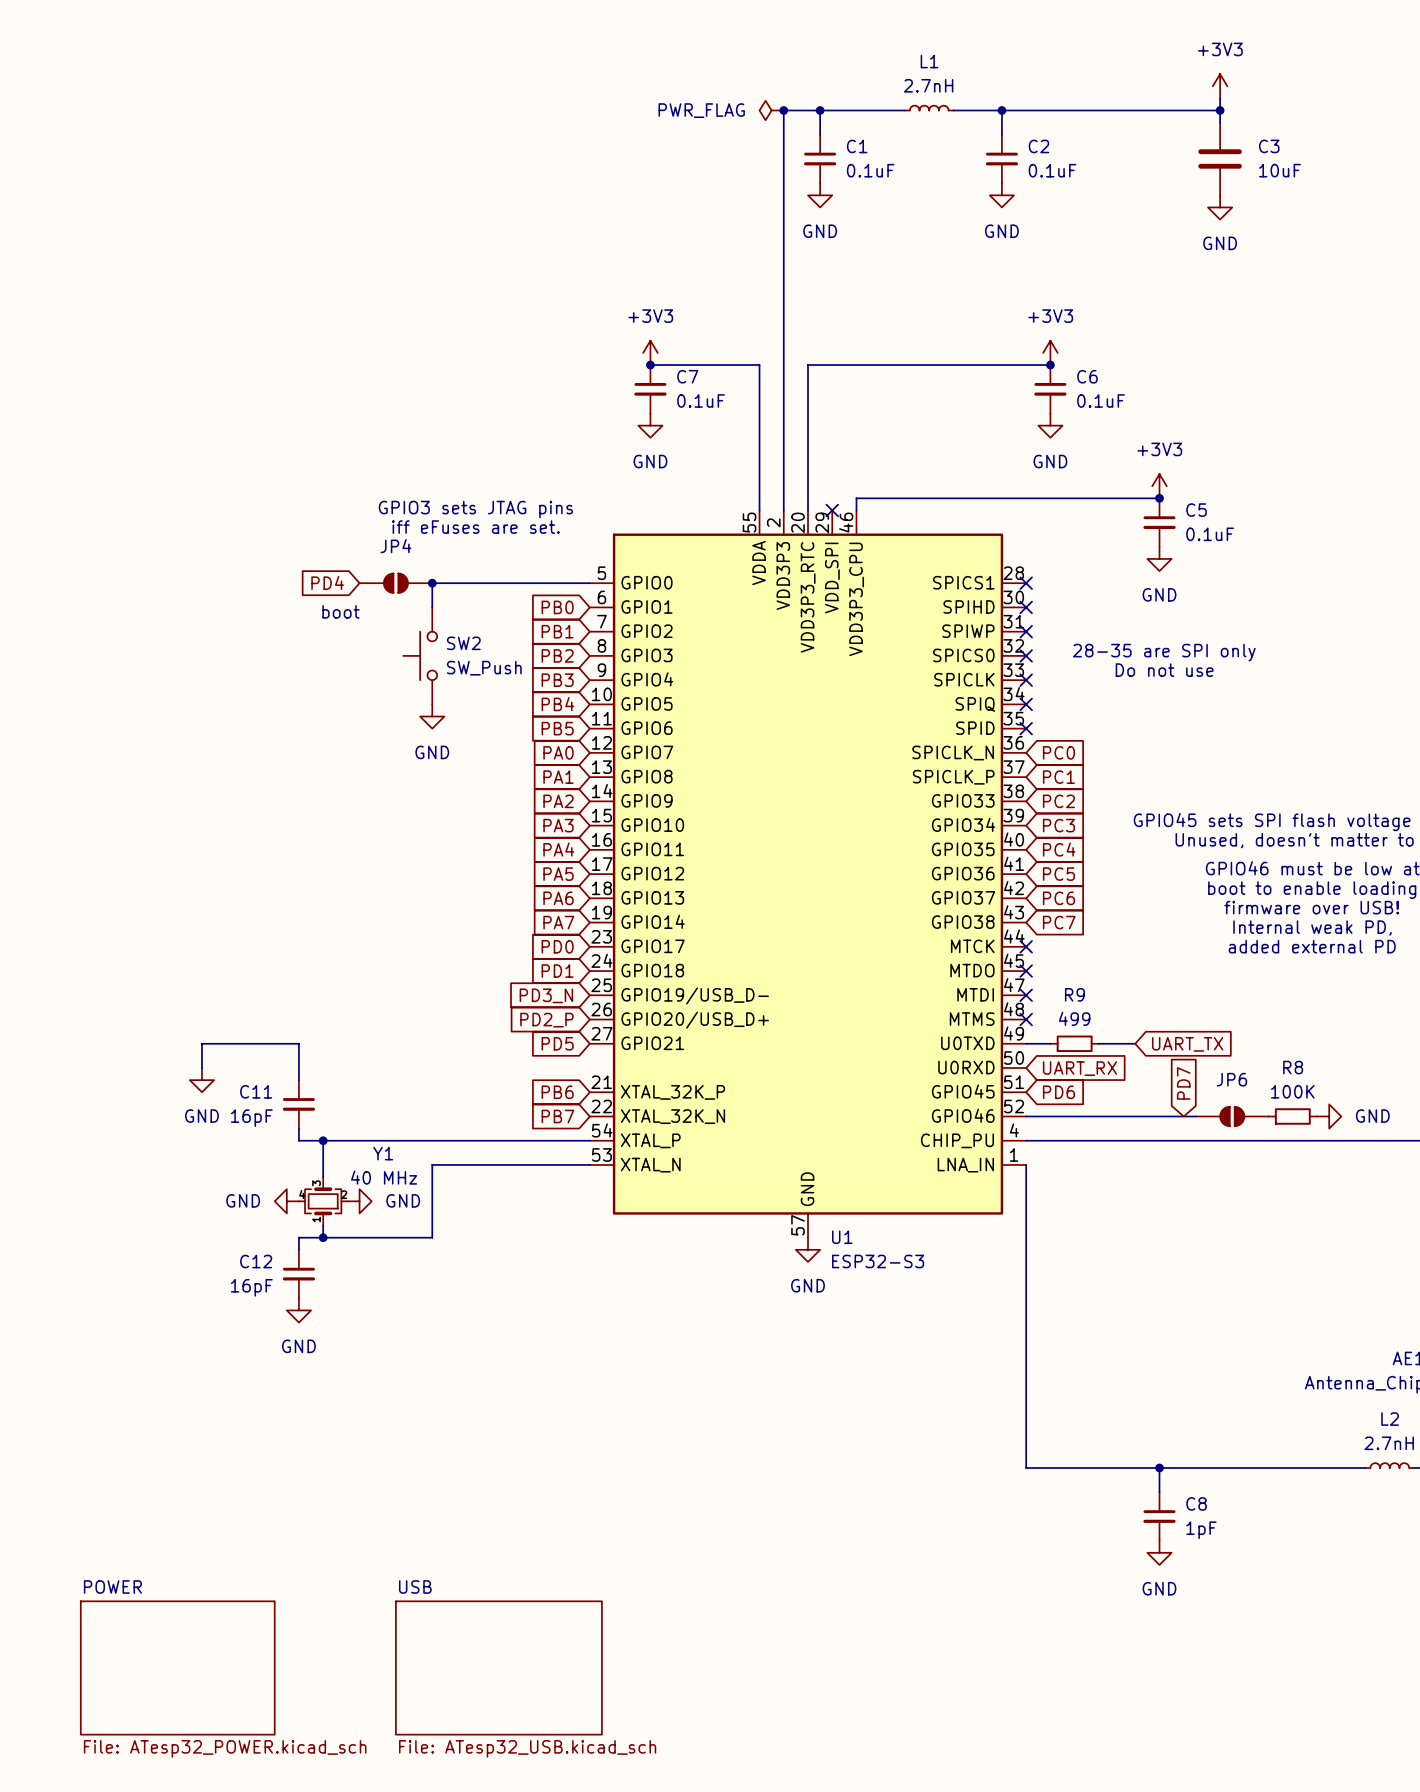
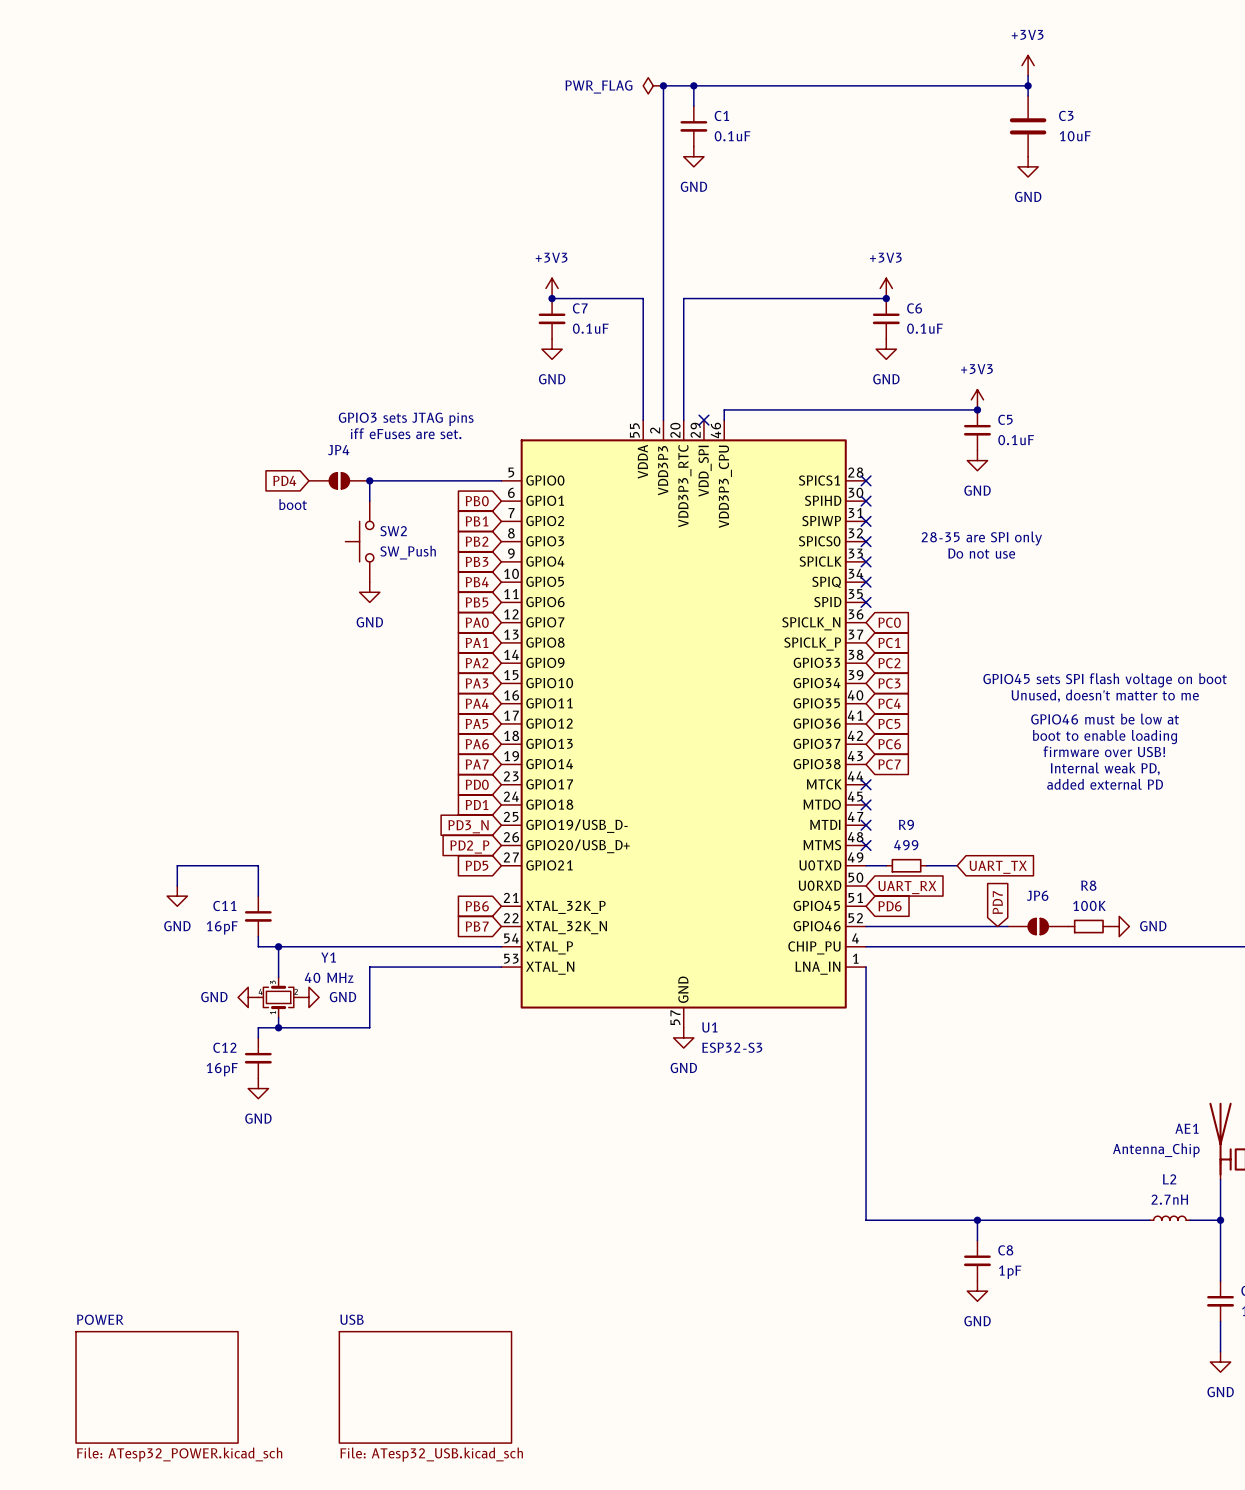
L1: 2.7nH (929, 108) -> none
wire: none -> (764, 85) (805, 85)
wire: (1001, 110) (1001, 134) -> none
junction: (1001, 110) -> none
C2: 0.1uF (1001, 158) -> none
power symbol: GND (1001, 195) -> none

